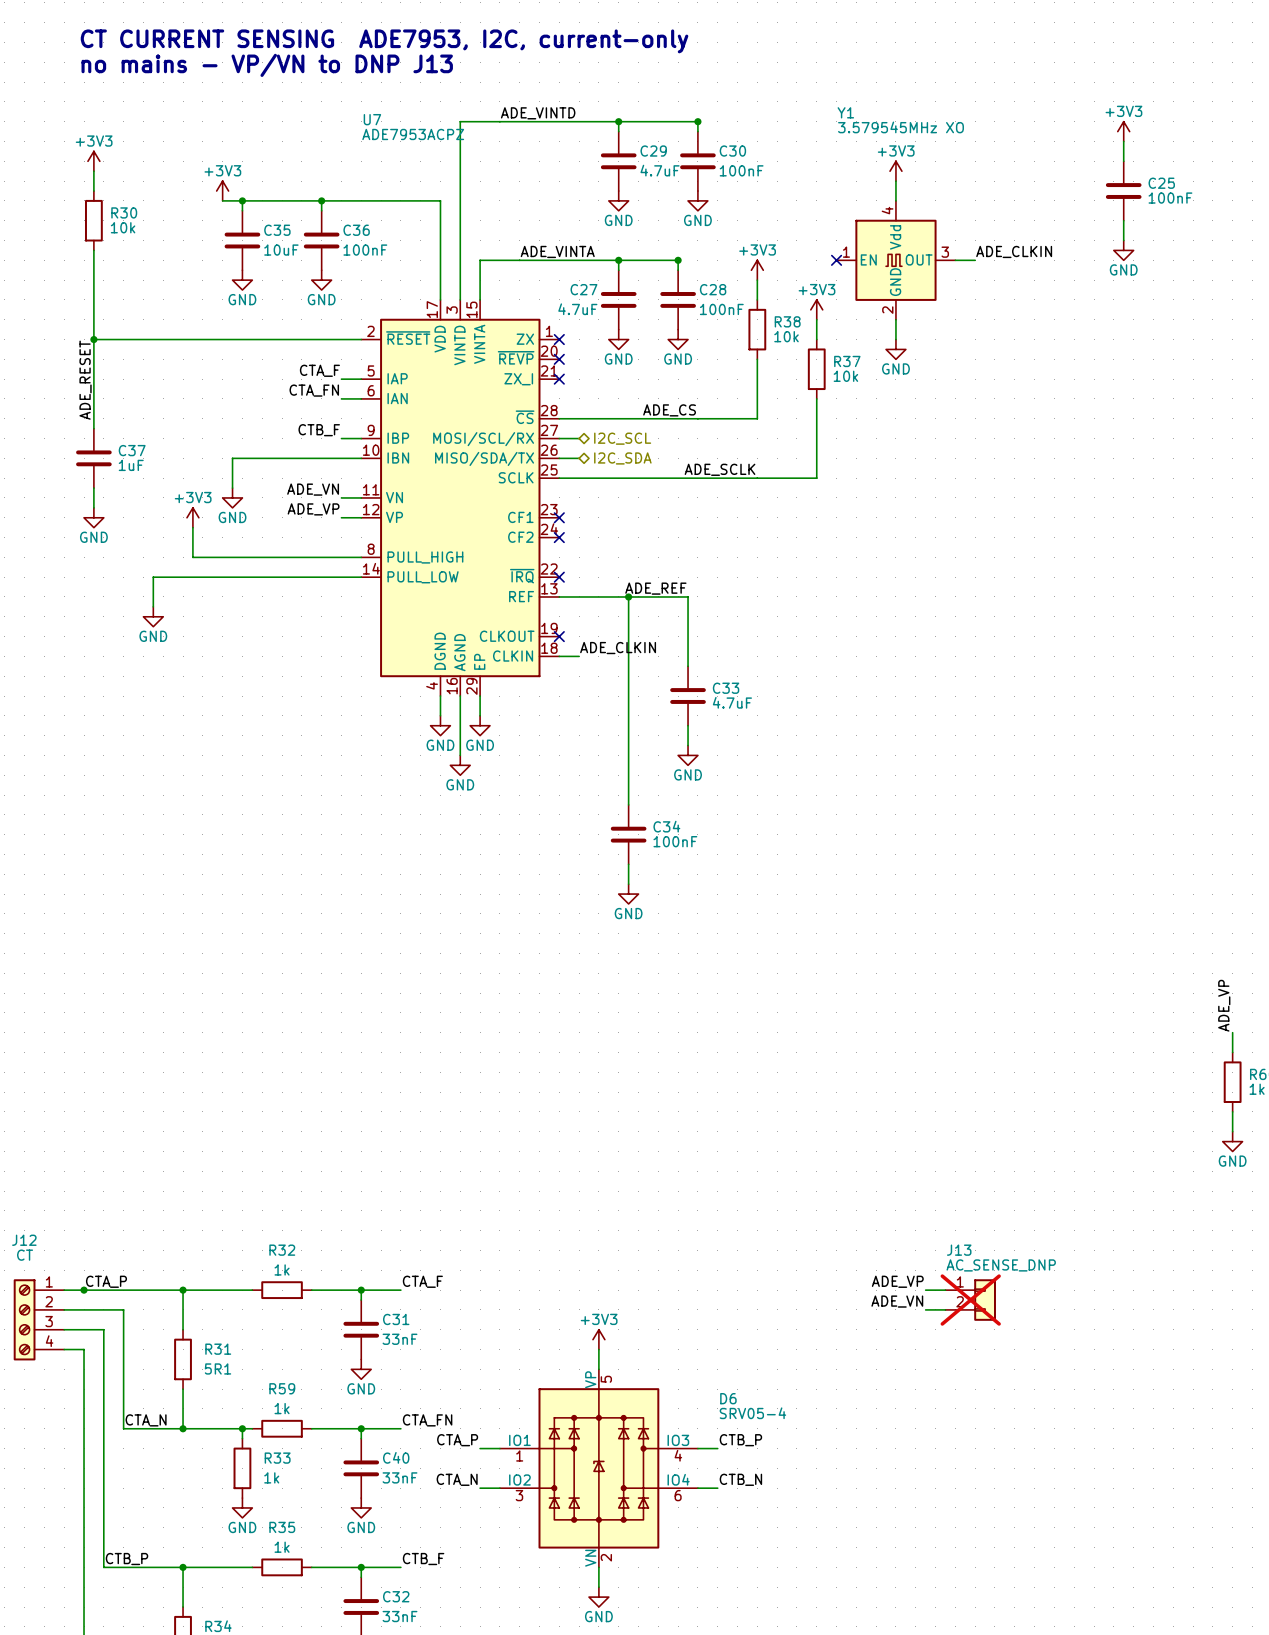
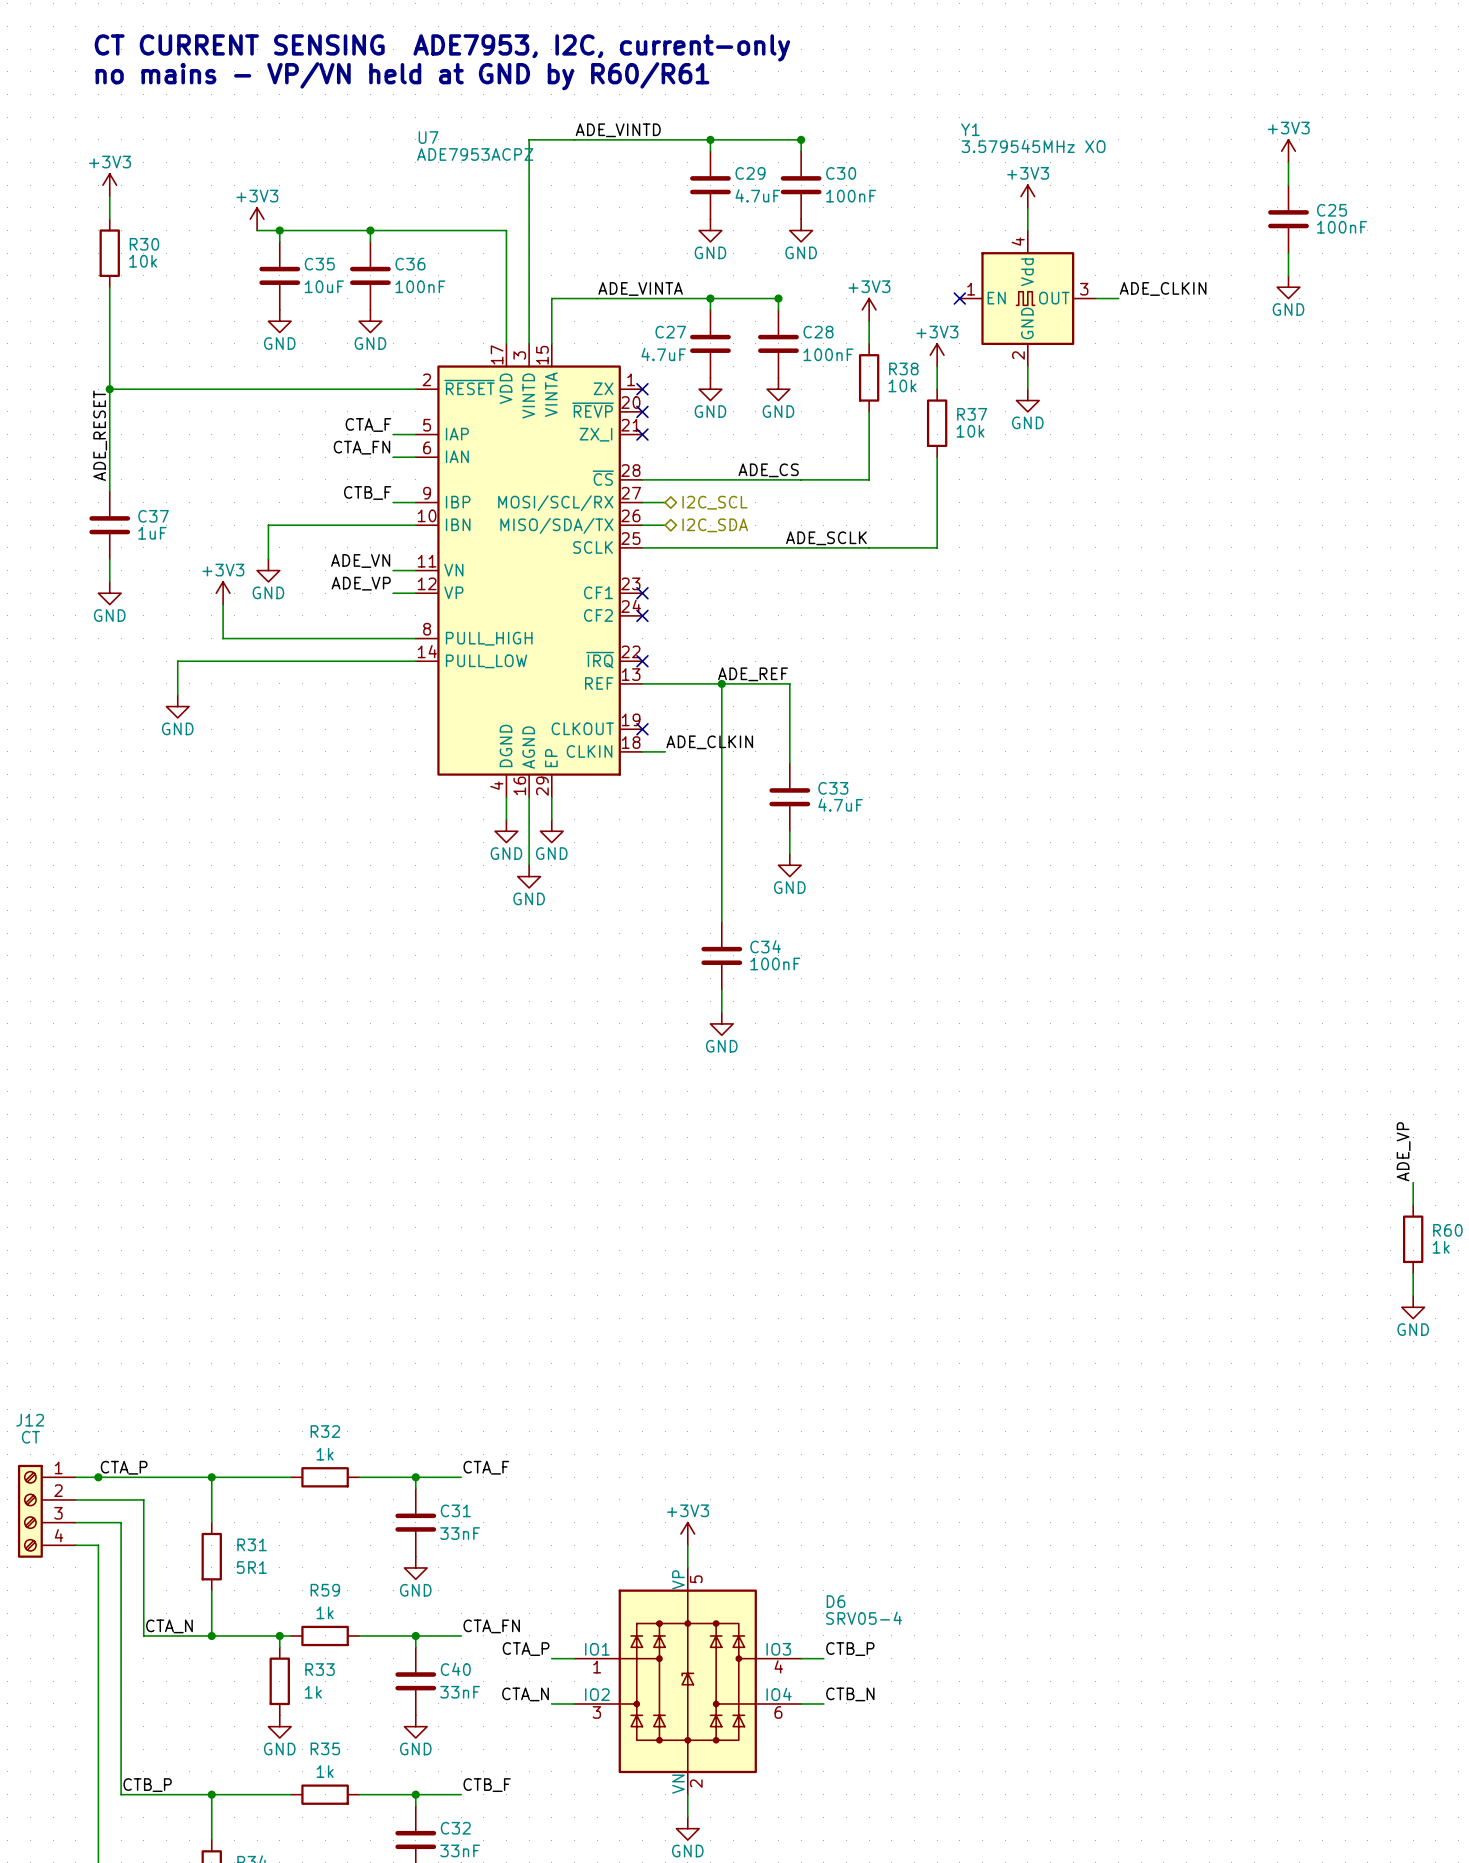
text: no mains - VP/VN to DNP J13 (267, 65) -> no mains - VP/VN held at GND by R60/R61 (402, 76)
label: ADE_VP (897, 1281) -> none
wire: (925, 1290) (945, 1290) -> none
J13: AC_SENSE_DNP (970, 1300) -> none
label: ADE_VN (897, 1301) -> none
wire: (925, 1309) (945, 1309) -> none

